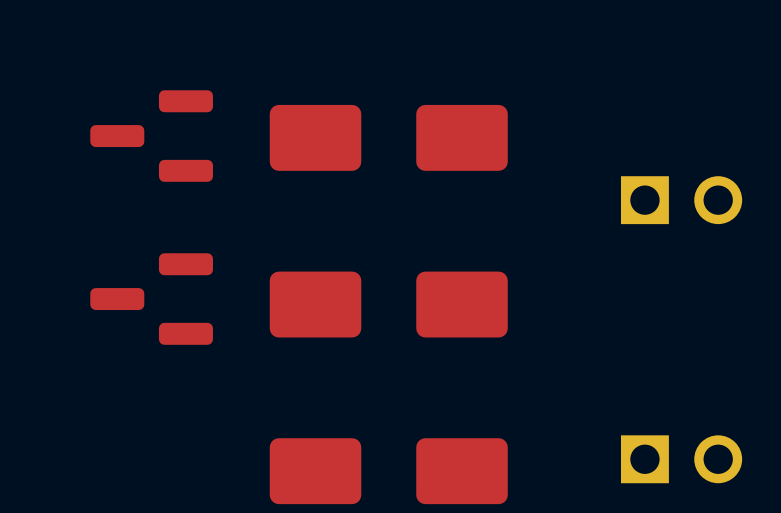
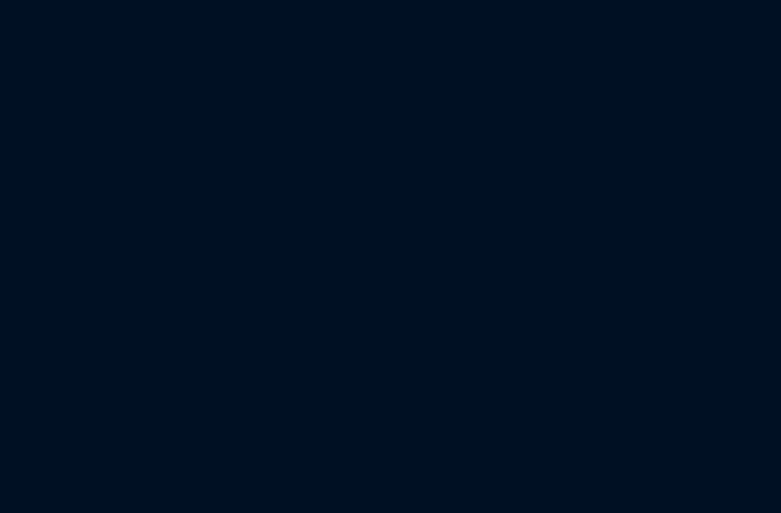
part: (151, 136) -> none
part: (388, 137) -> none
part: (681, 200) -> none
part: (151, 299) -> none
part: (388, 304) -> none
part: (681, 459) -> none
part: (388, 471) -> none

